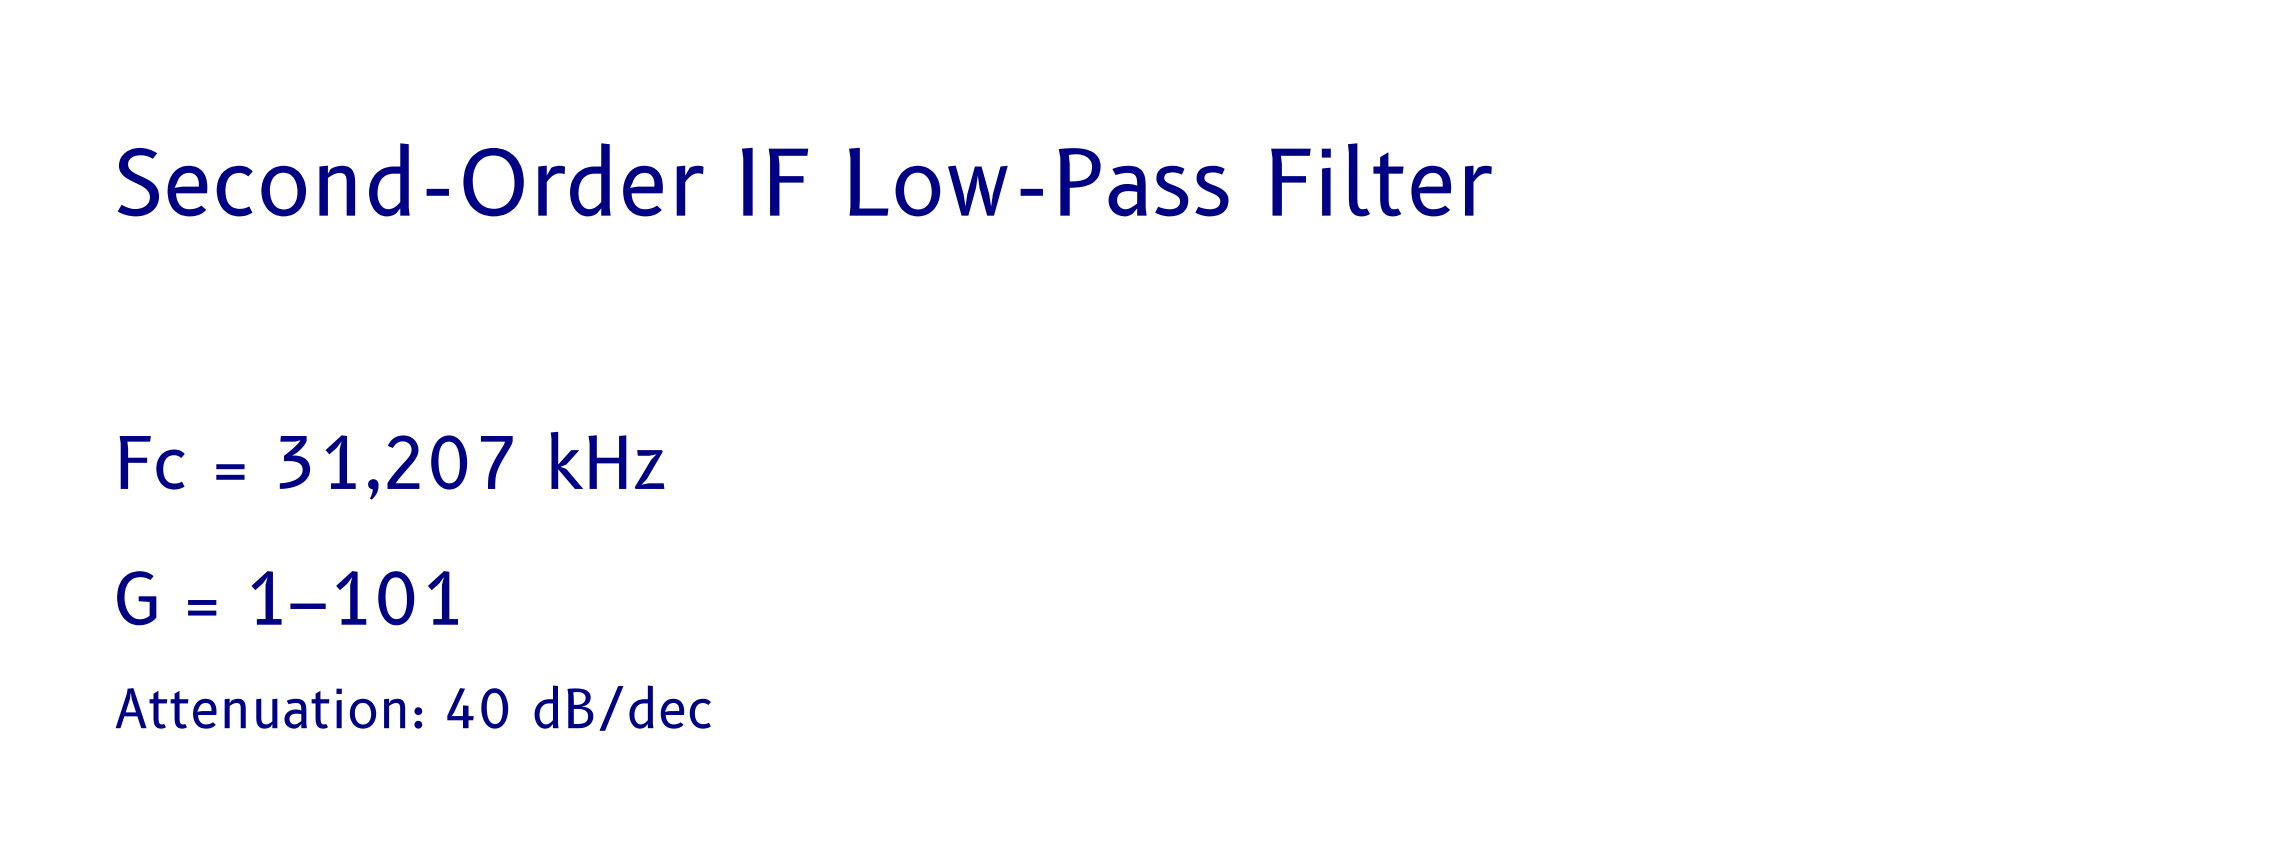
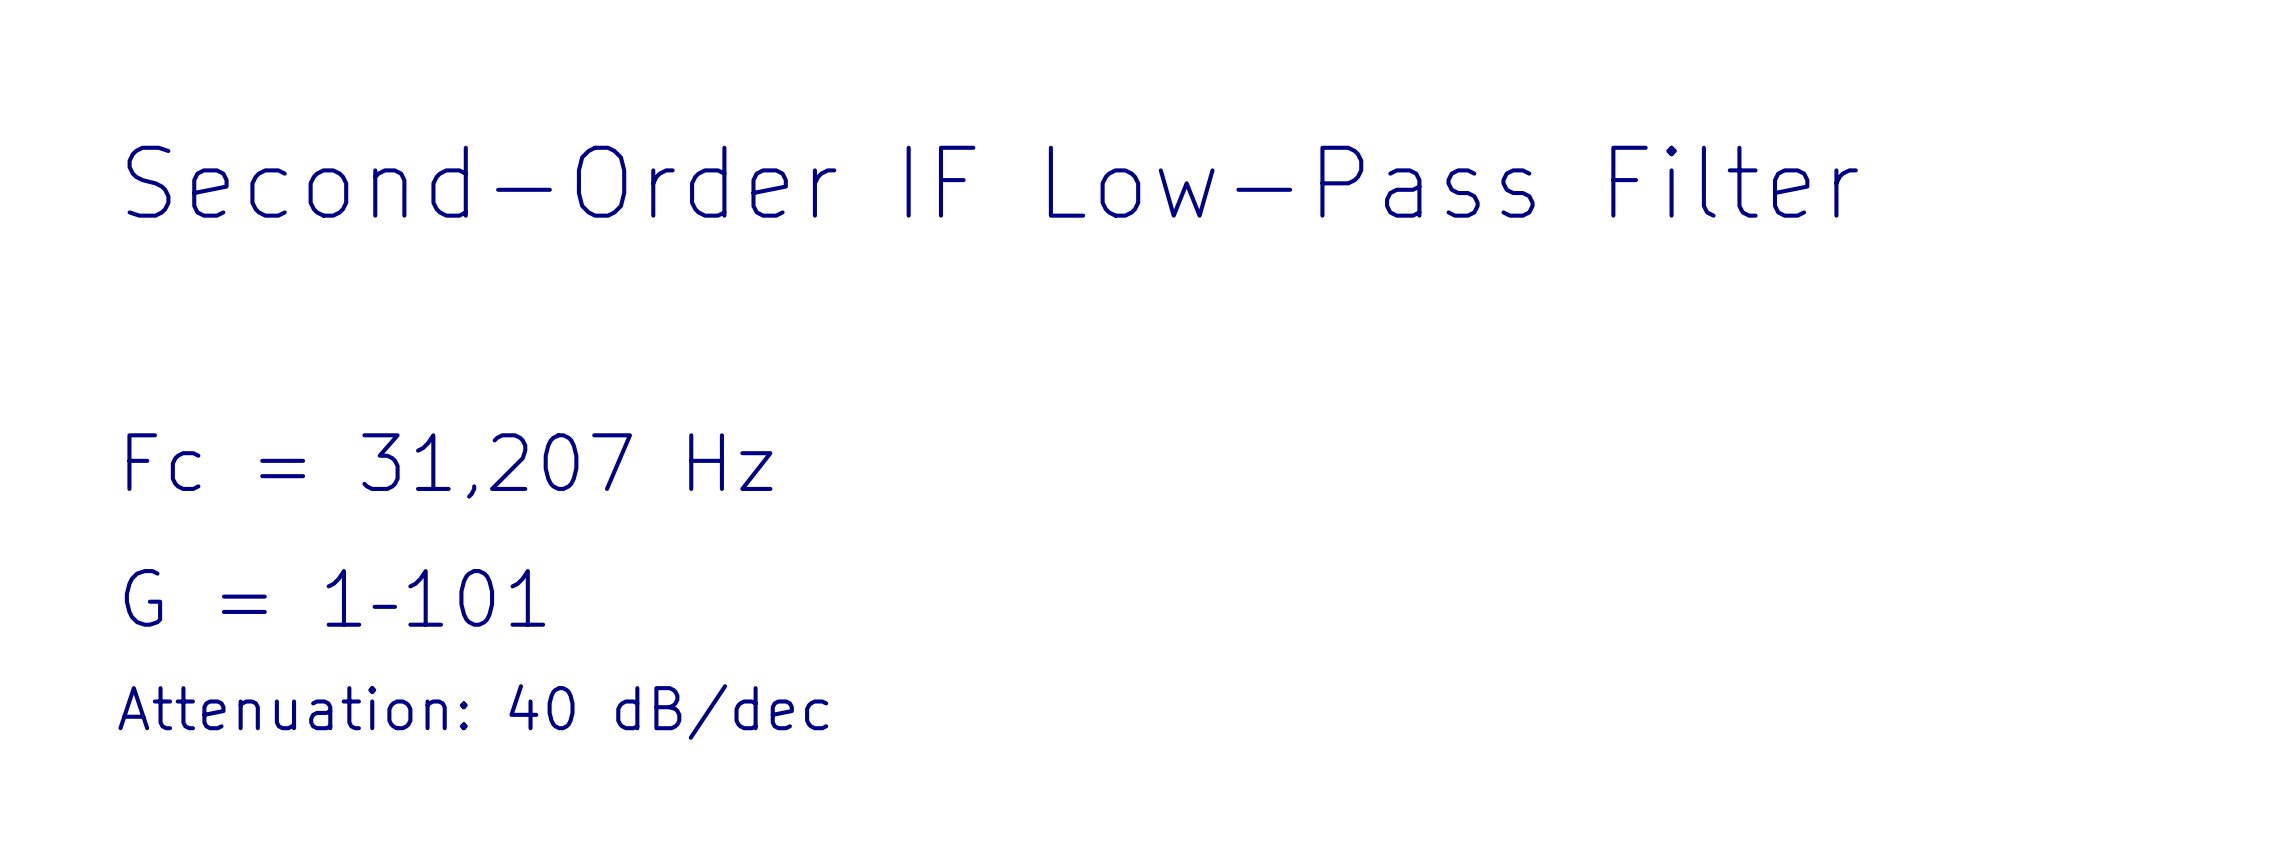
text: Fc = 31,207 kHz (392, 465) -> Fc = 31,207 Hz (449, 465)

